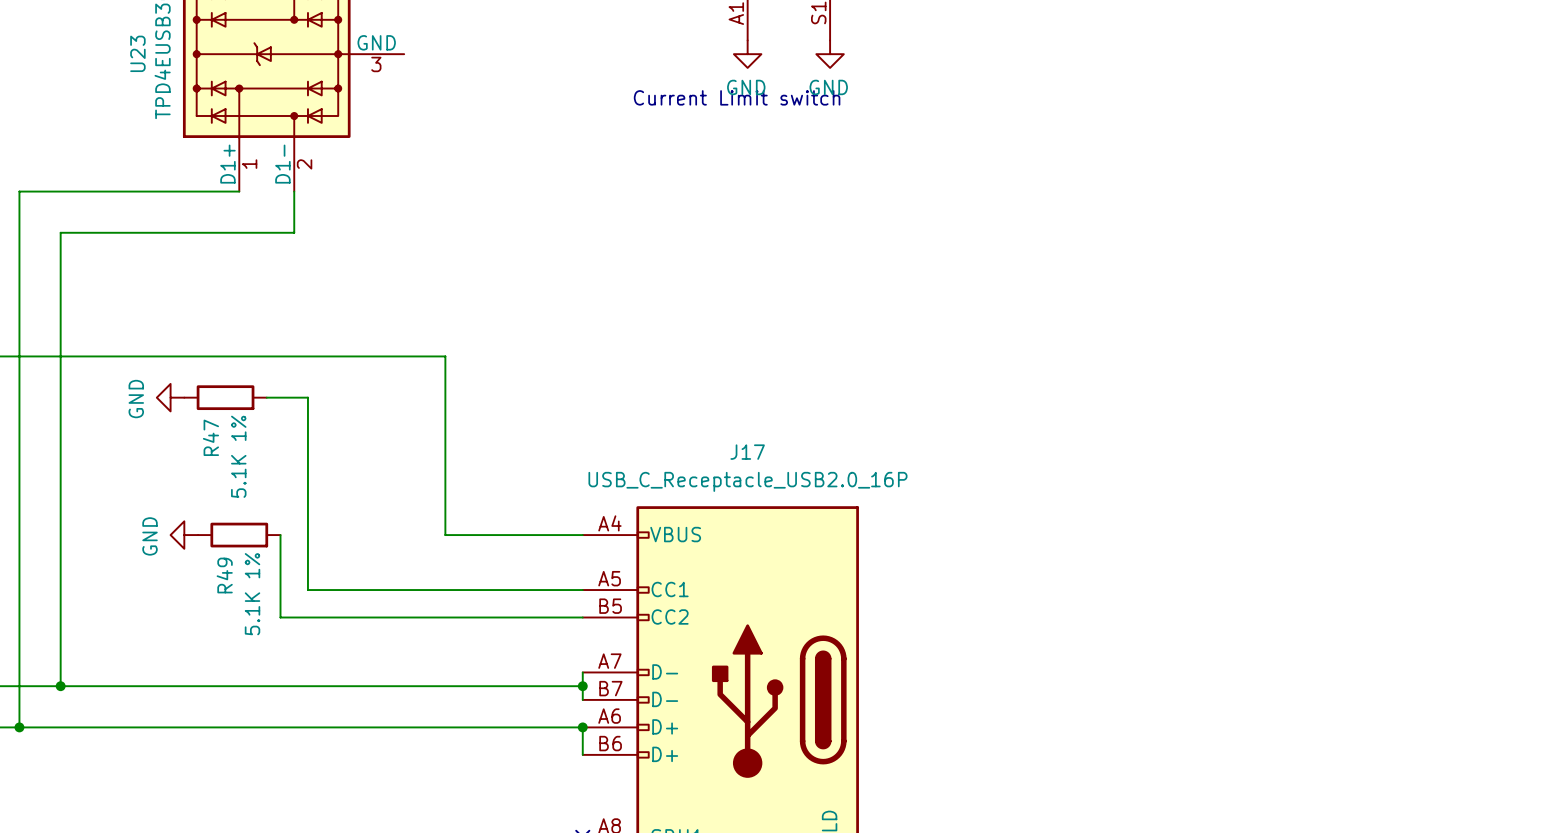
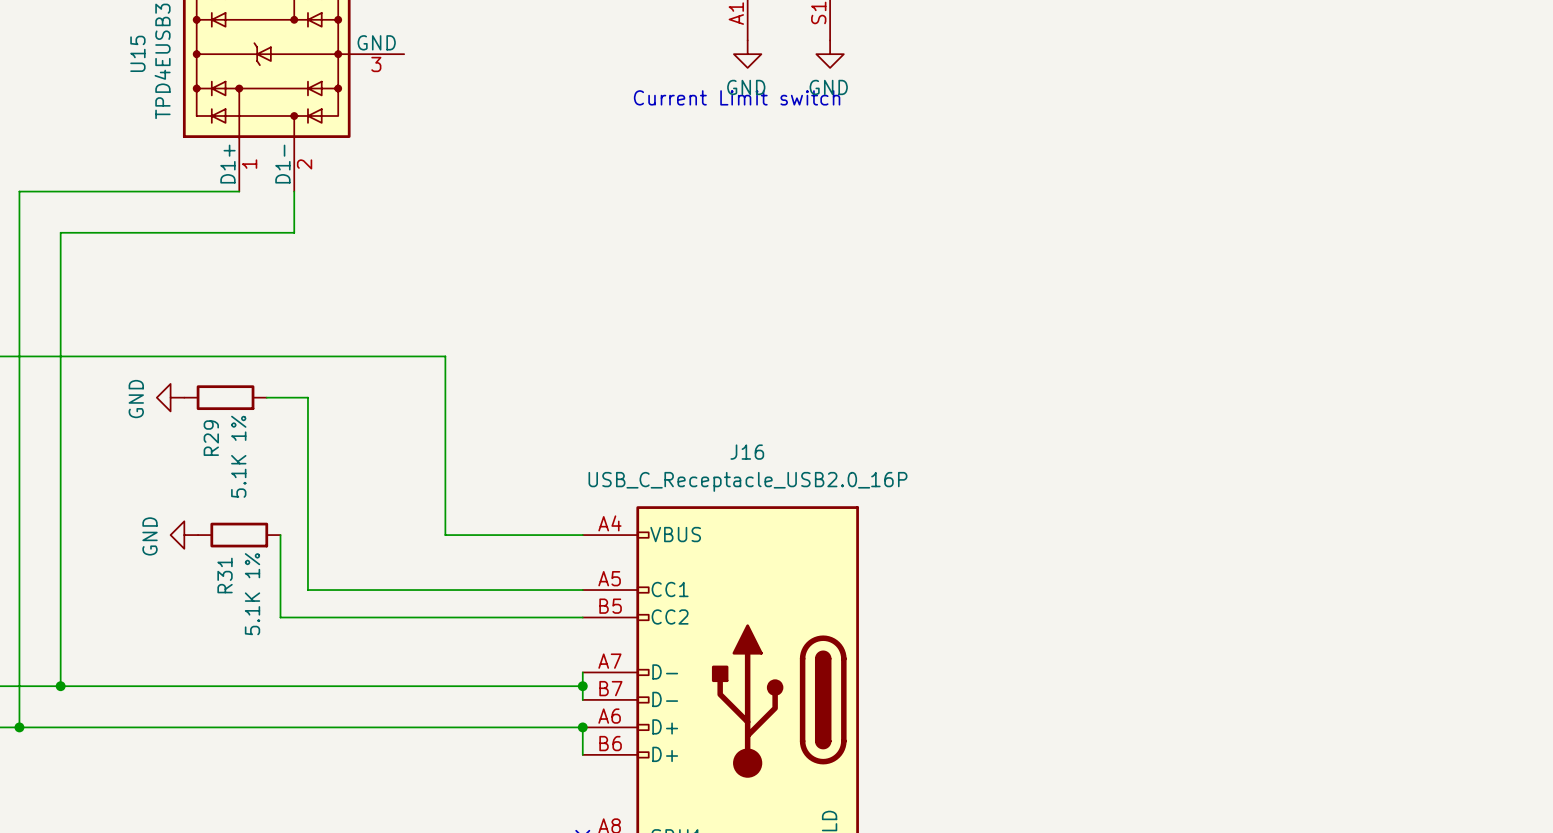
U23 name: U23 (137, 53) -> U15 (137, 53)
R47 name: R47 (210, 437) -> R29 (211, 438)
J17 name: J17 (747, 452) -> J16 (747, 452)
R49 name: R49 (224, 575) -> R31 (225, 575)

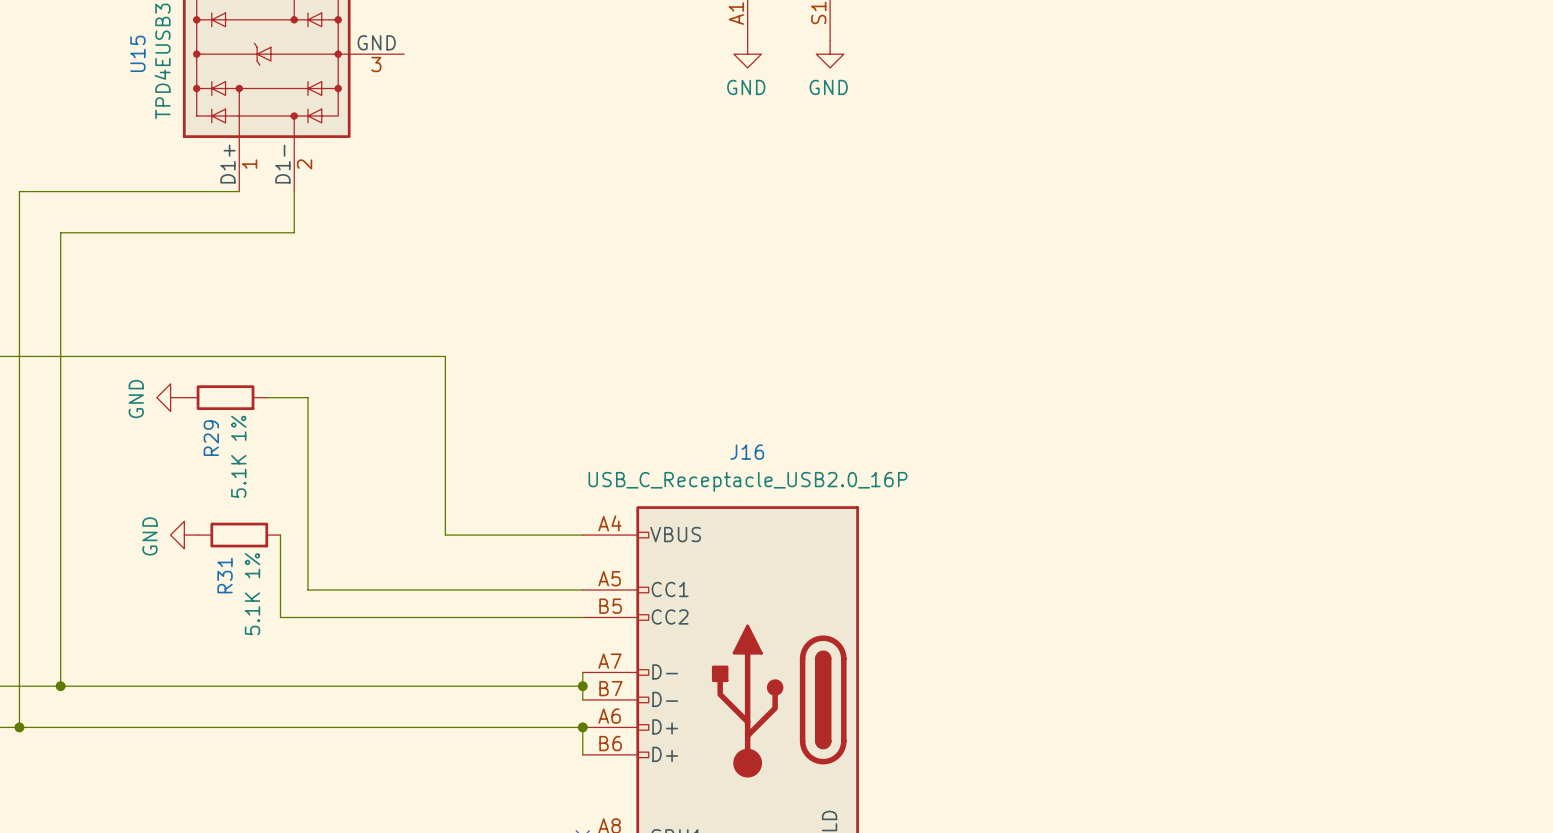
text: Current Limit switch (737, 97) -> none

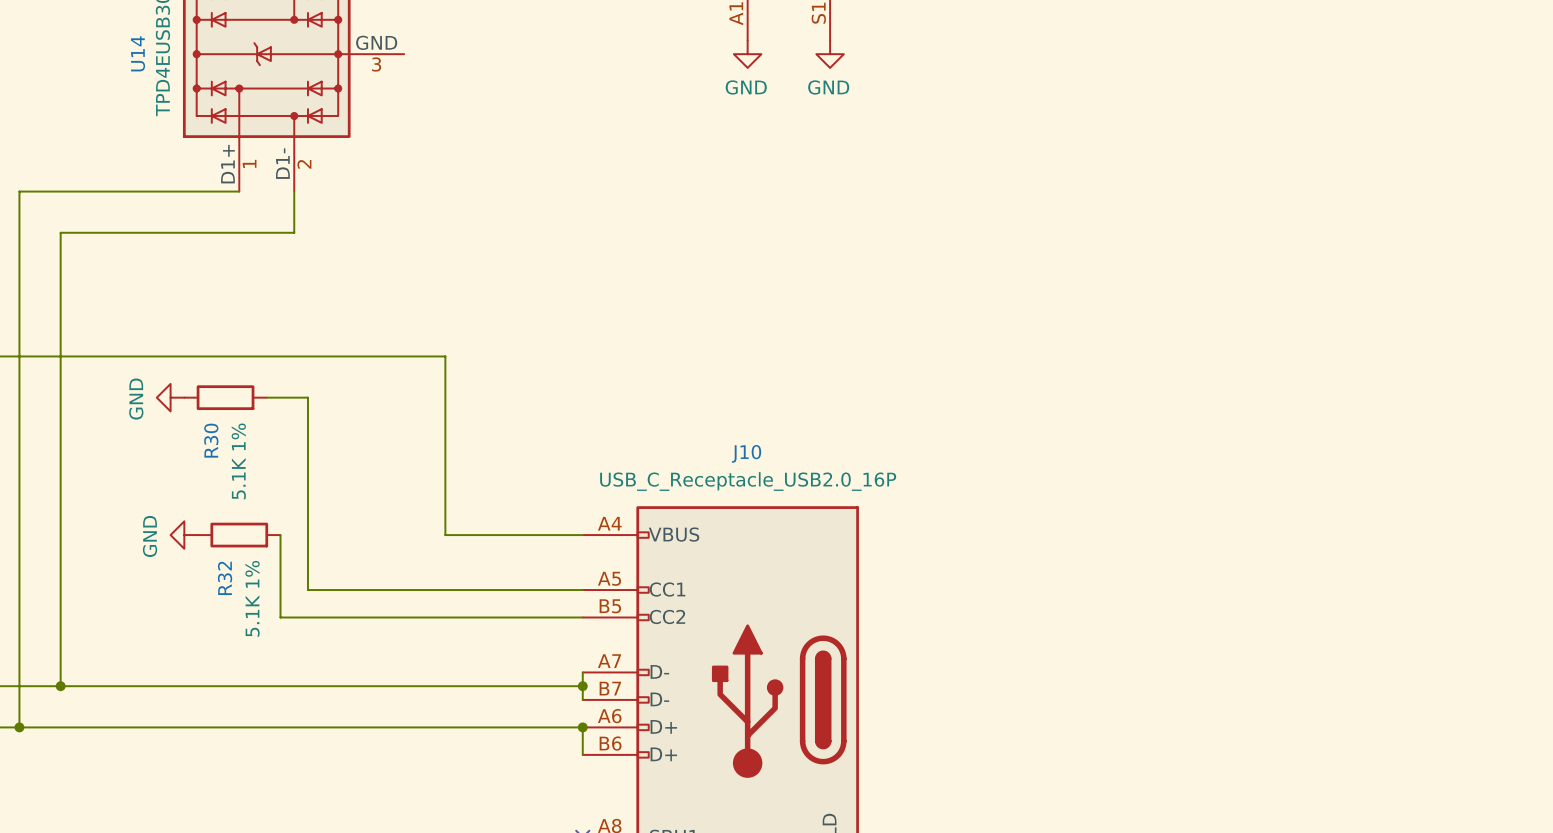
U15 name: U15 (137, 53) -> U14 (138, 53)
R29 name: R29 (211, 438) -> R30 (211, 440)
J16 name: J16 (747, 452) -> J10 (746, 453)
R31 name: R31 (225, 575) -> R32 (225, 578)

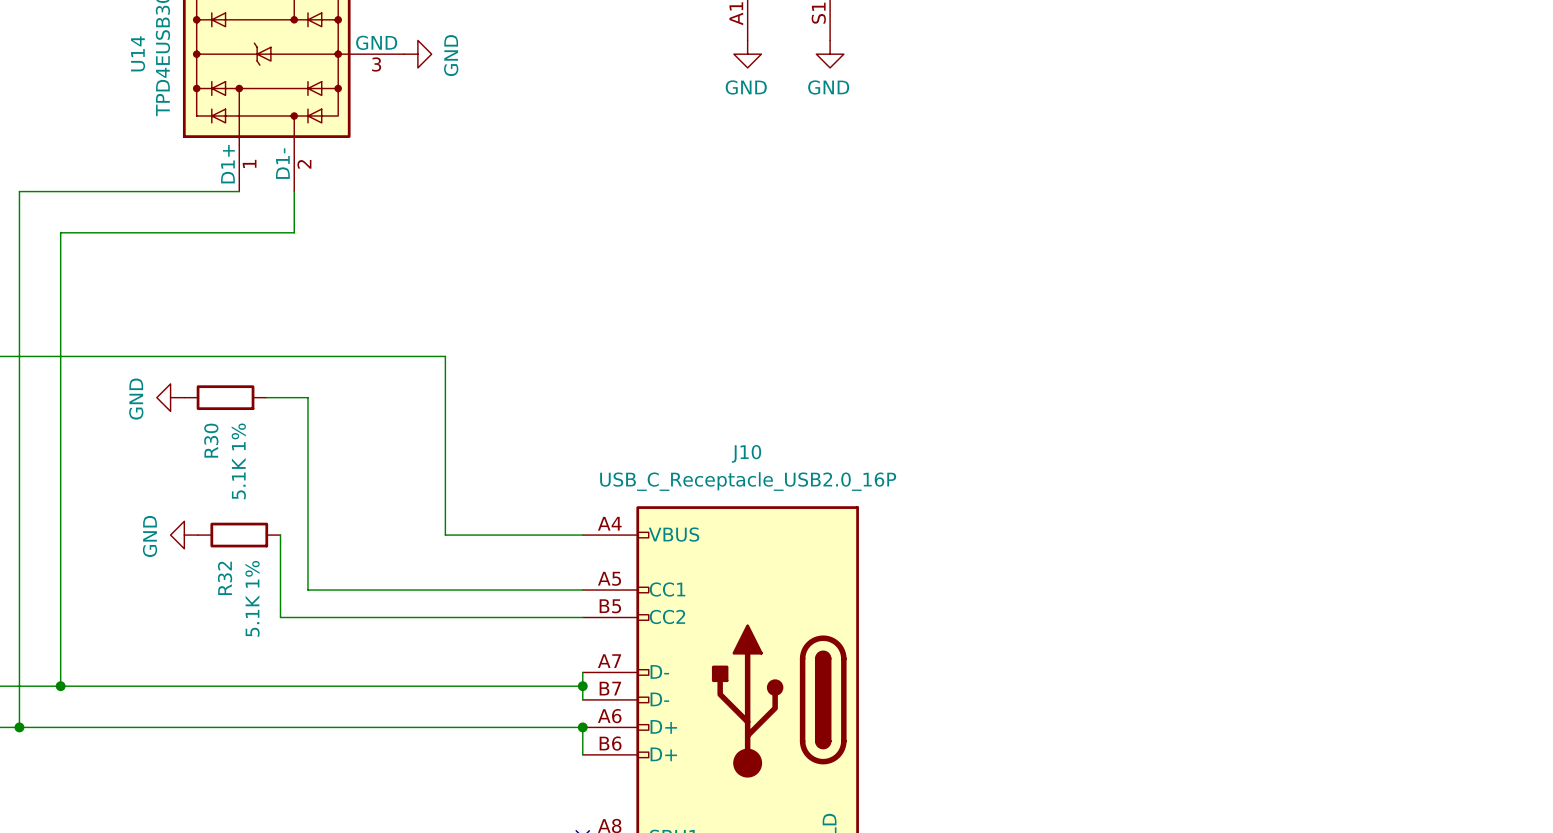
power symbol: none -> GND (417, 54)

